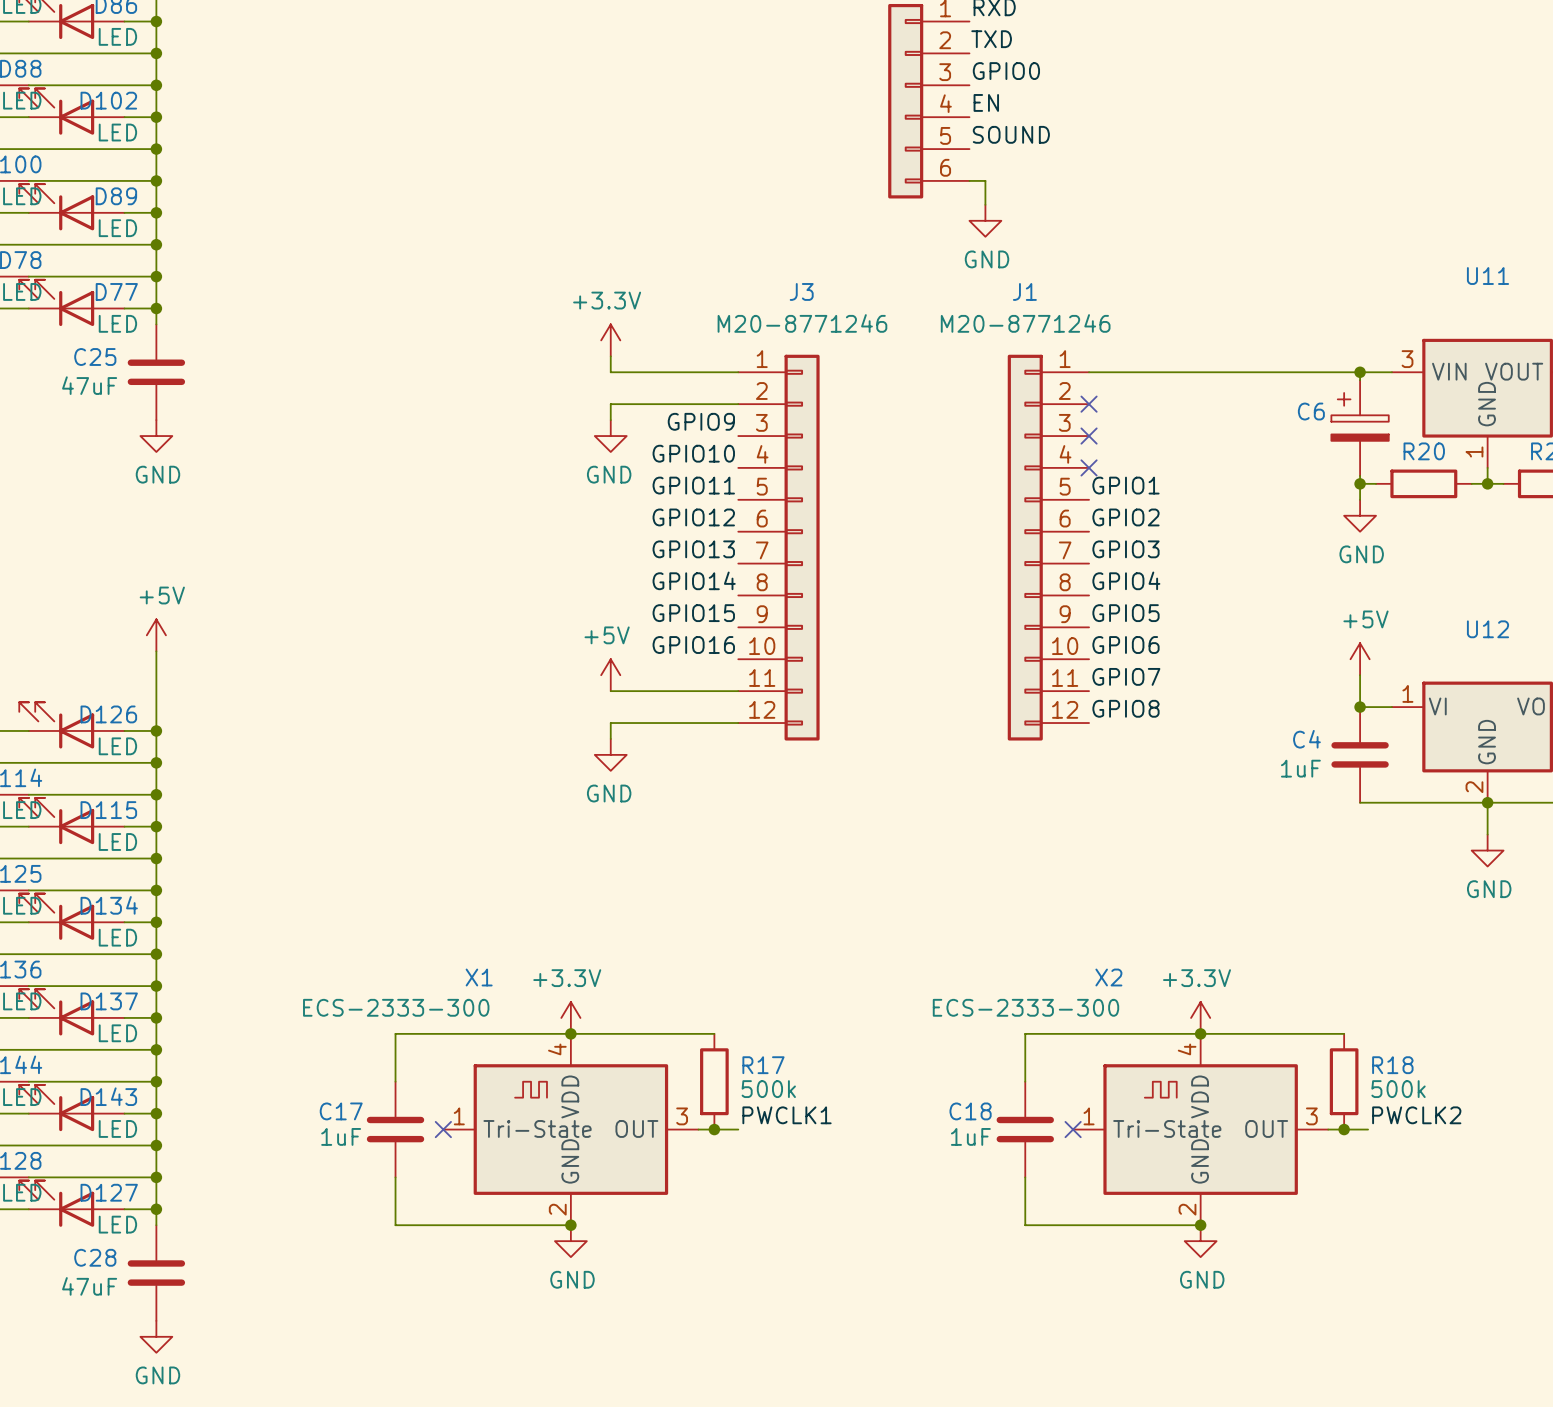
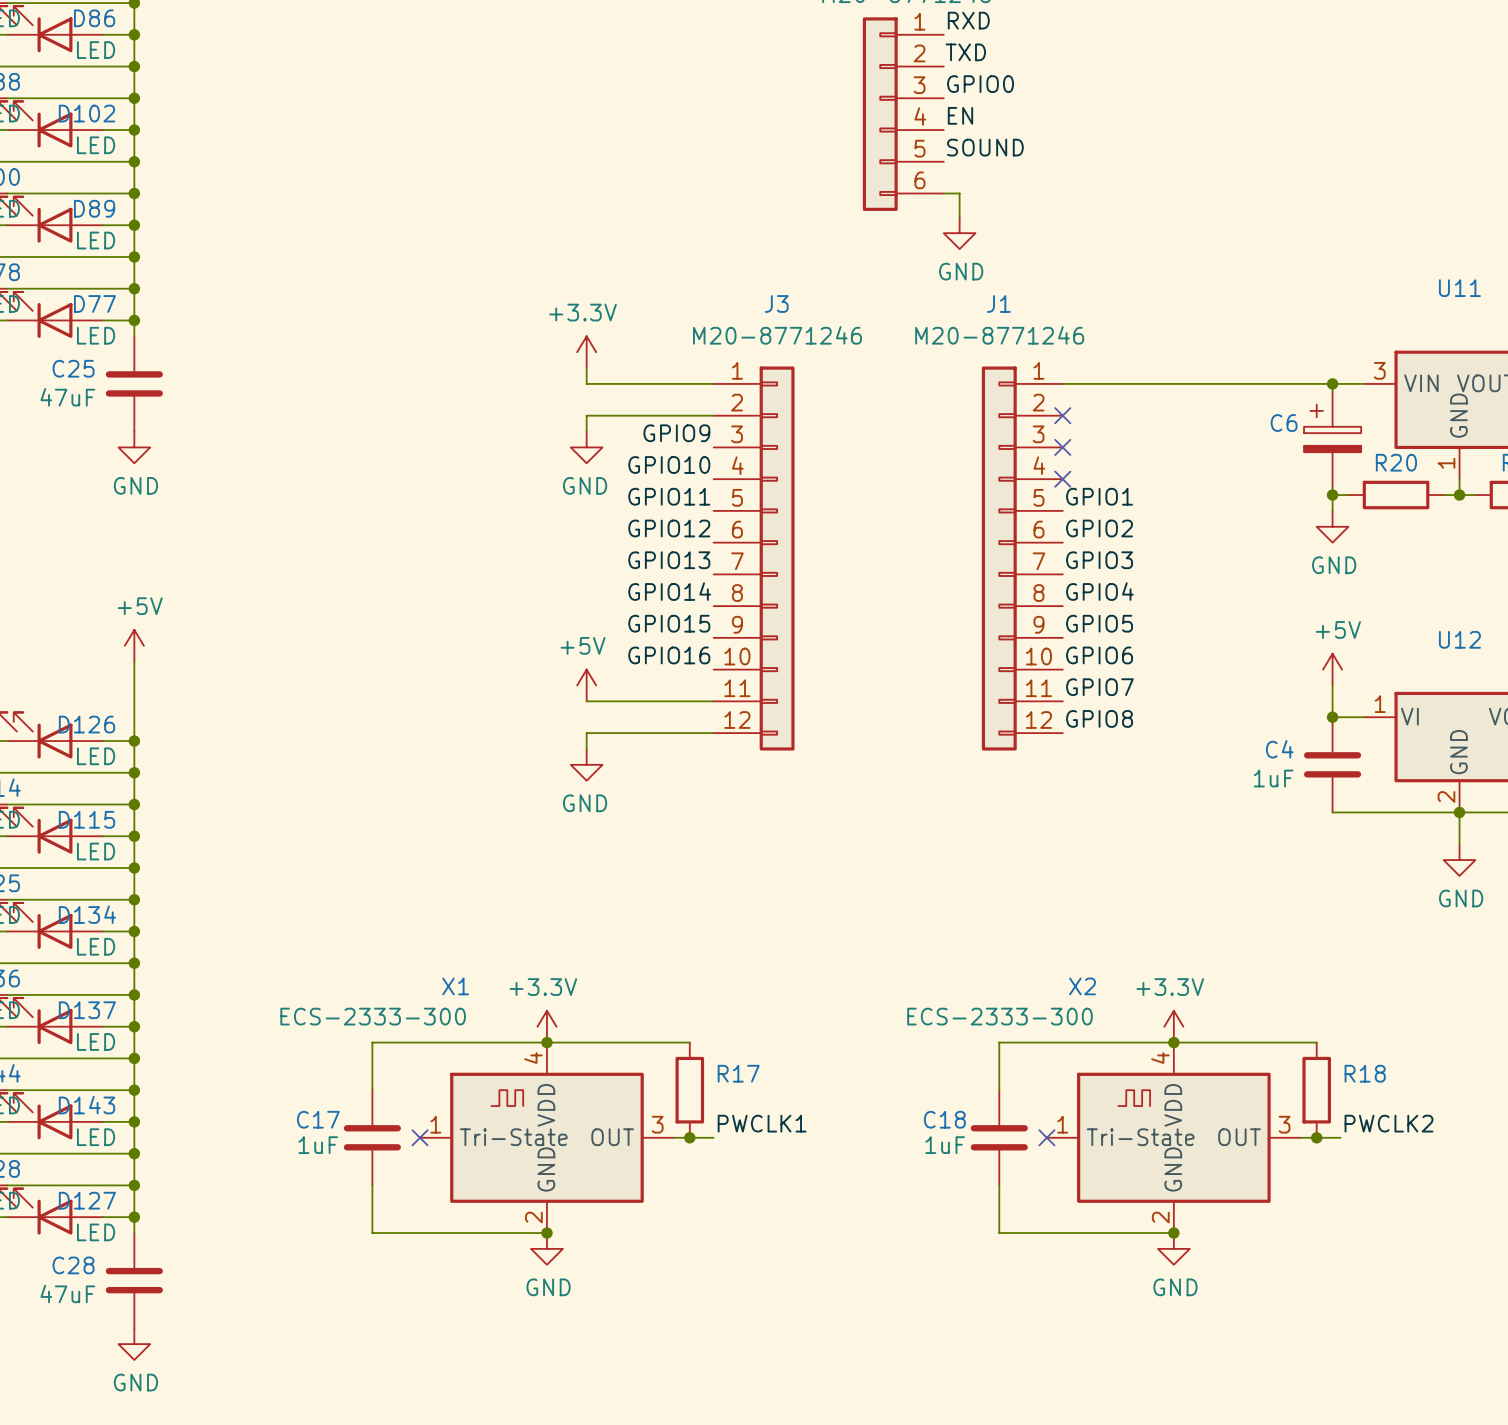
R17 value: 500k (768, 1089) -> none
R18 value: 500k (1398, 1089) -> none

